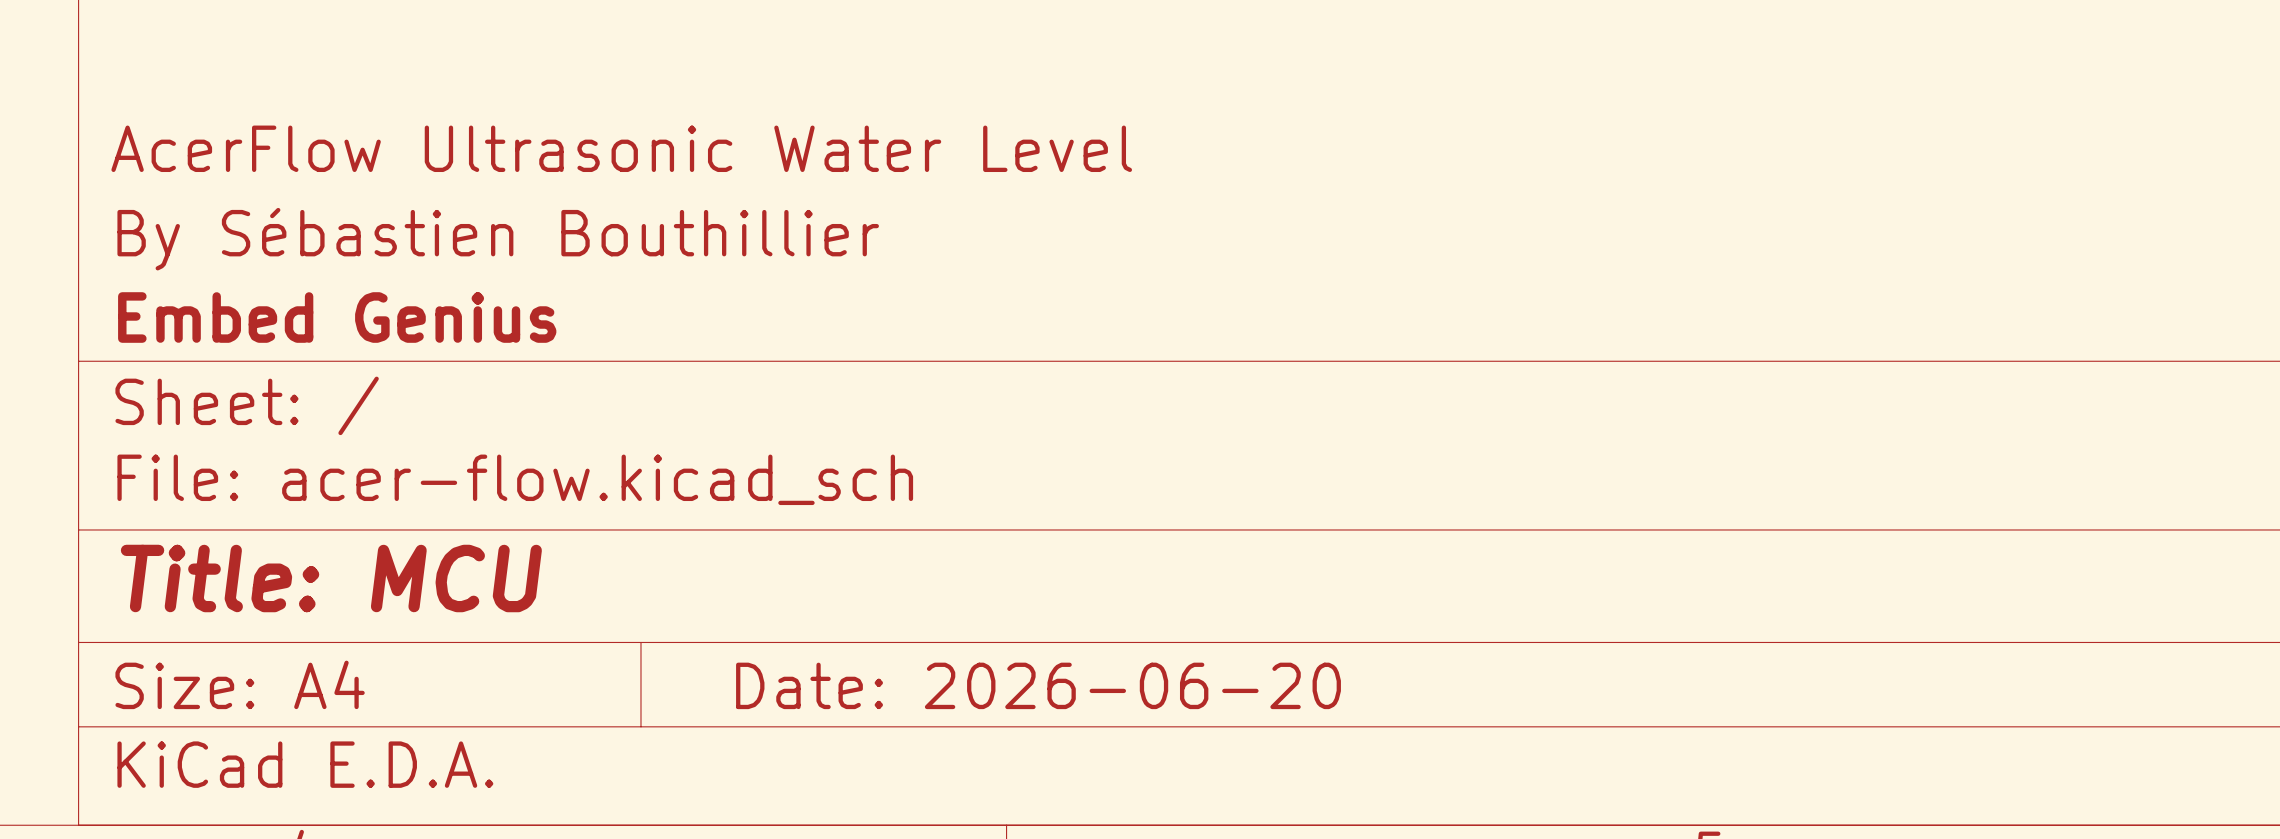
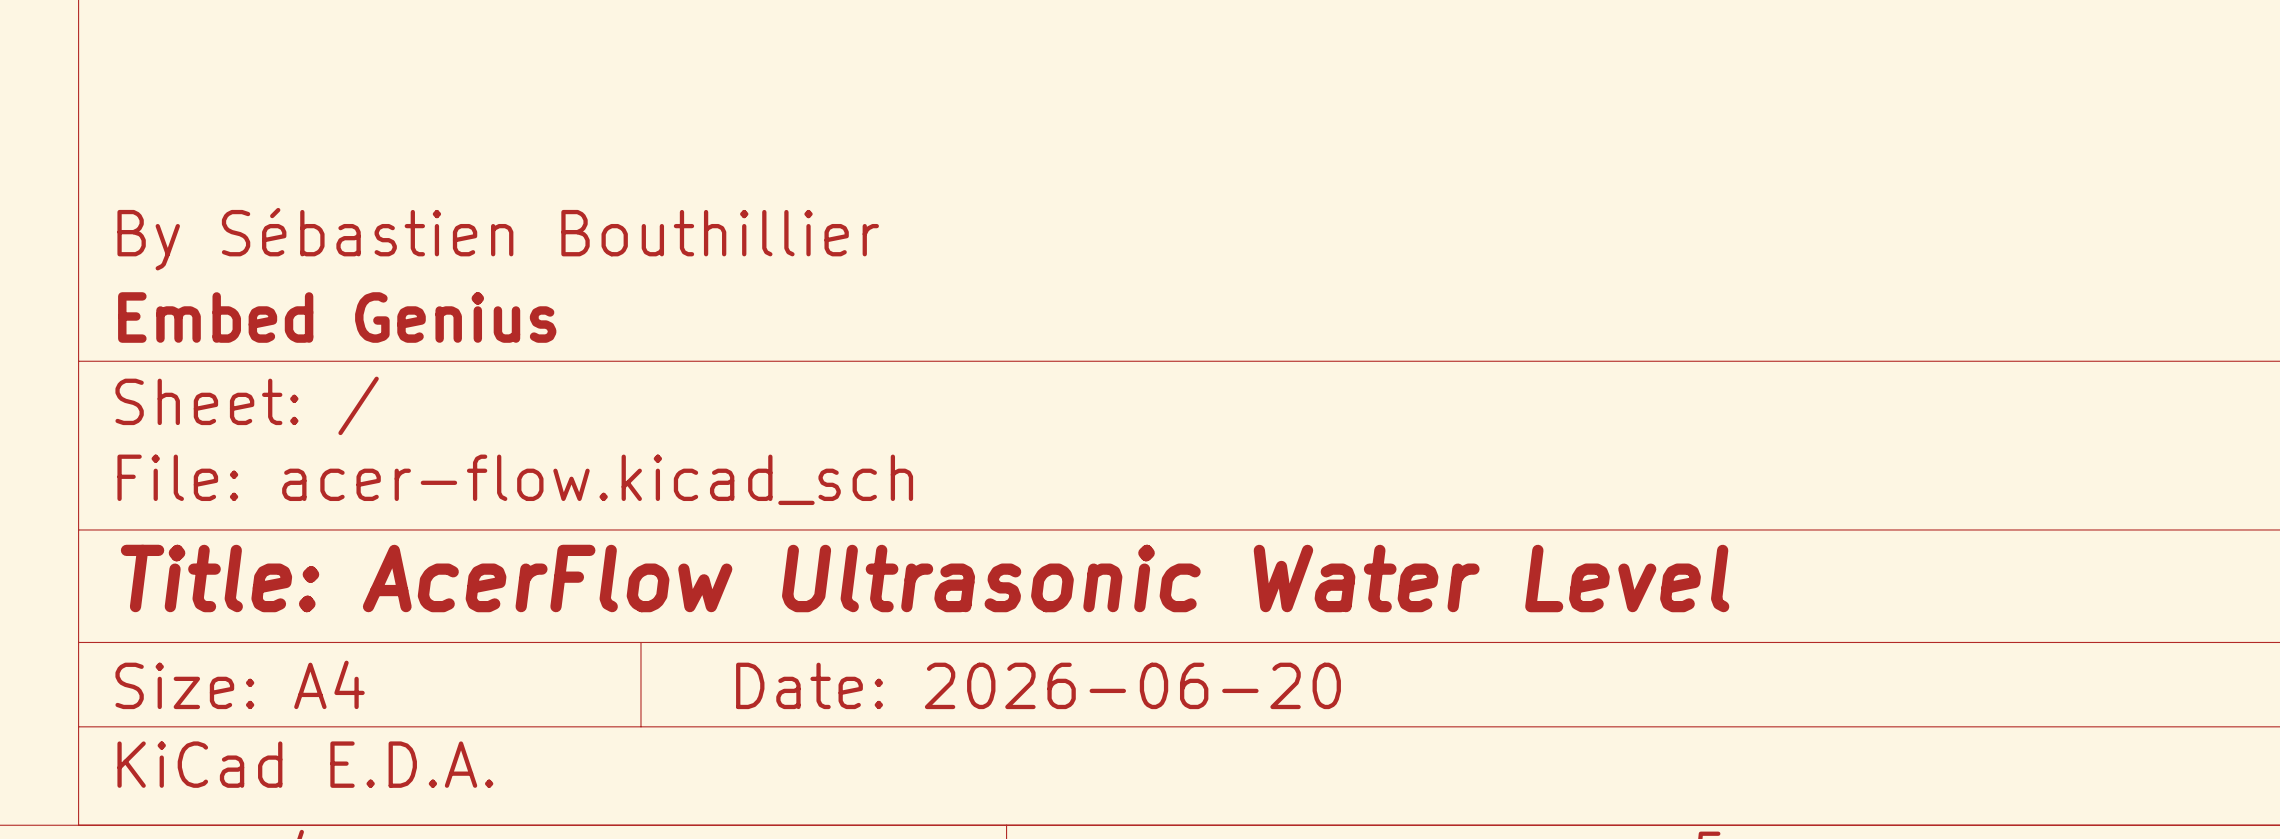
title block: AcerFlow Ultrasonic Water Level (621, 148) -> none
title block: Title: MCU (331, 578) -> Title: AcerFlow Ultrasonic Water Level (925, 578)

